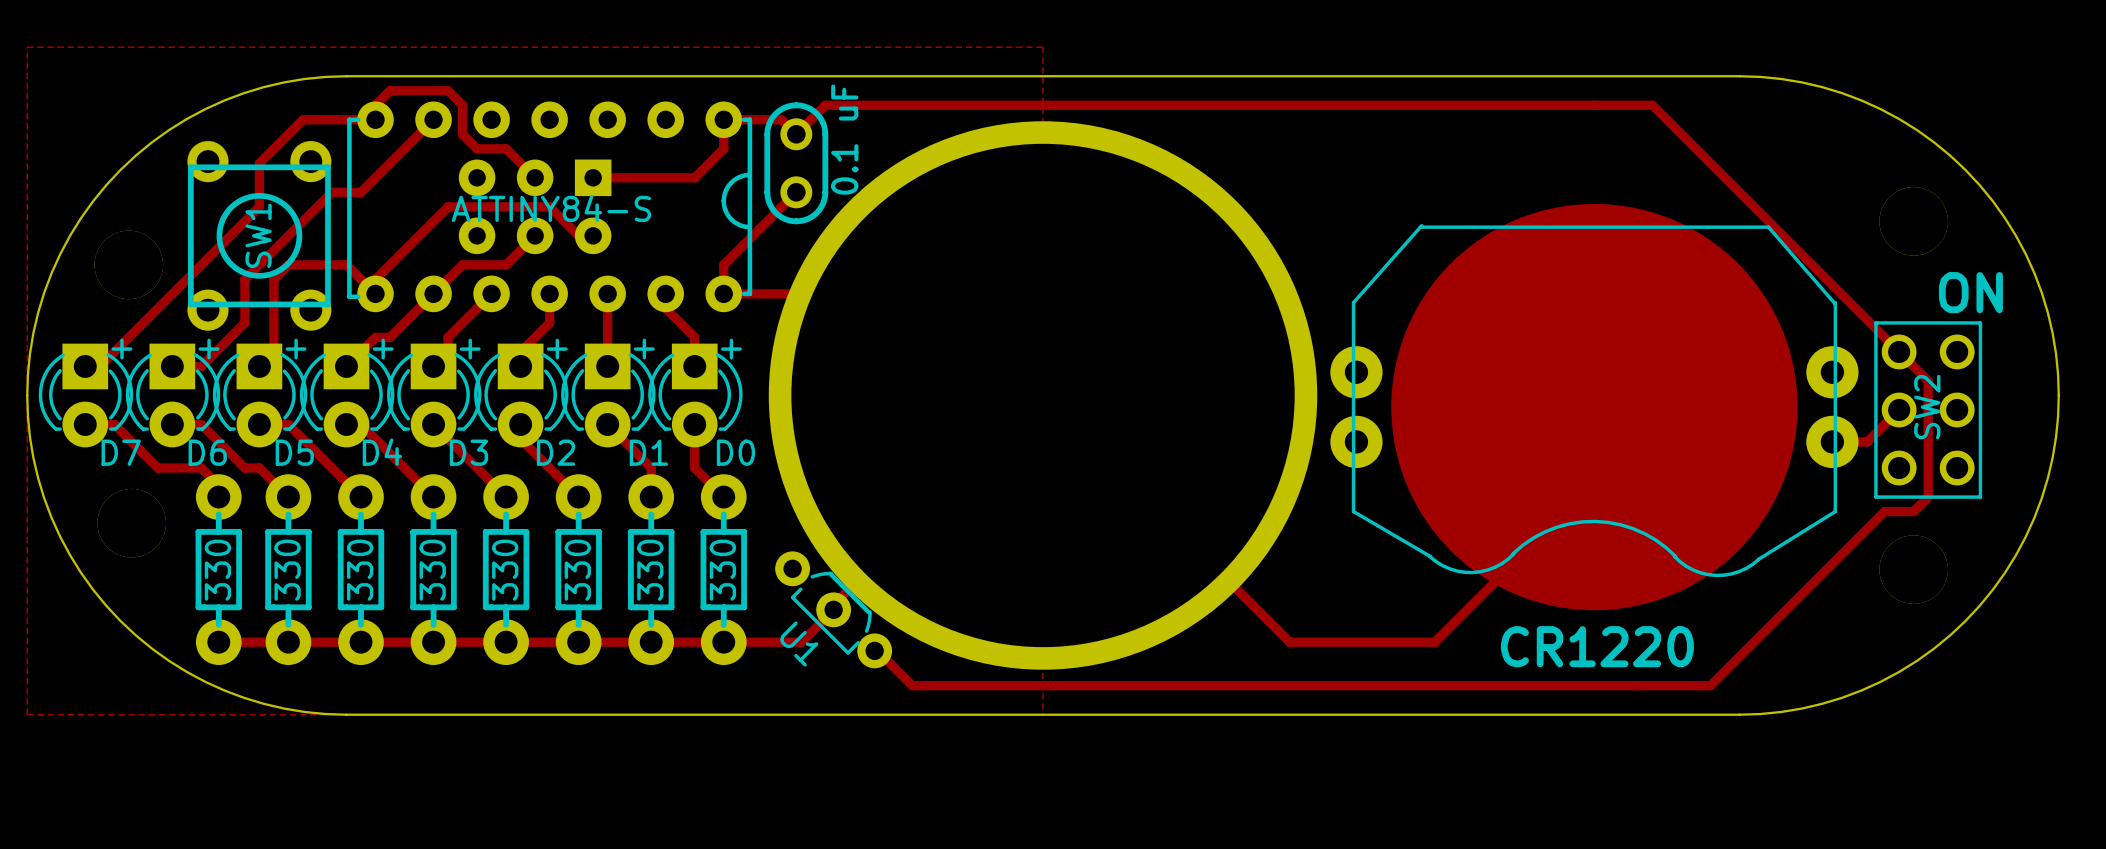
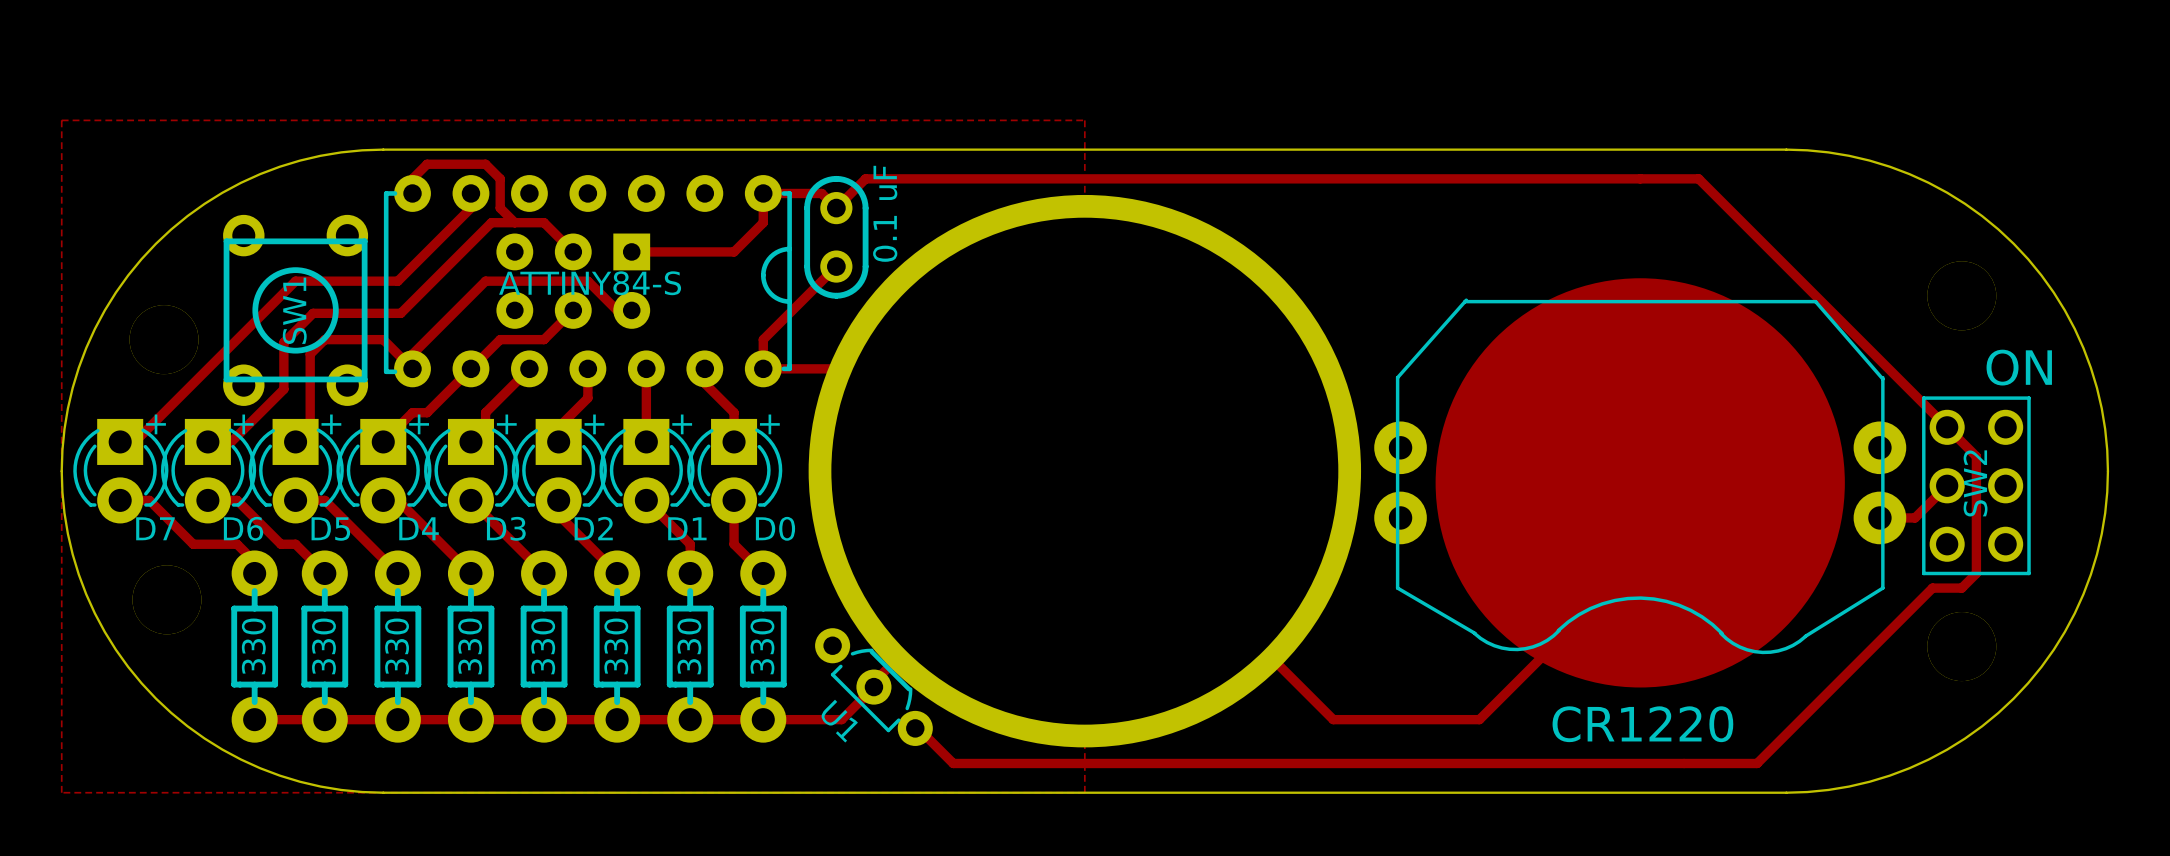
track: (375, 119) (302, 119) (259, 163) (259, 206) -> (470, 196) (470, 208) (397, 281) (295, 281)
track: (433, 119) (360, 192) (331, 192) (244, 279) (244, 322) (201, 366) (195, 366) -> (514, 222) (491, 222) (400, 313) (313, 313) (283, 342) (283, 389) (231, 441)

